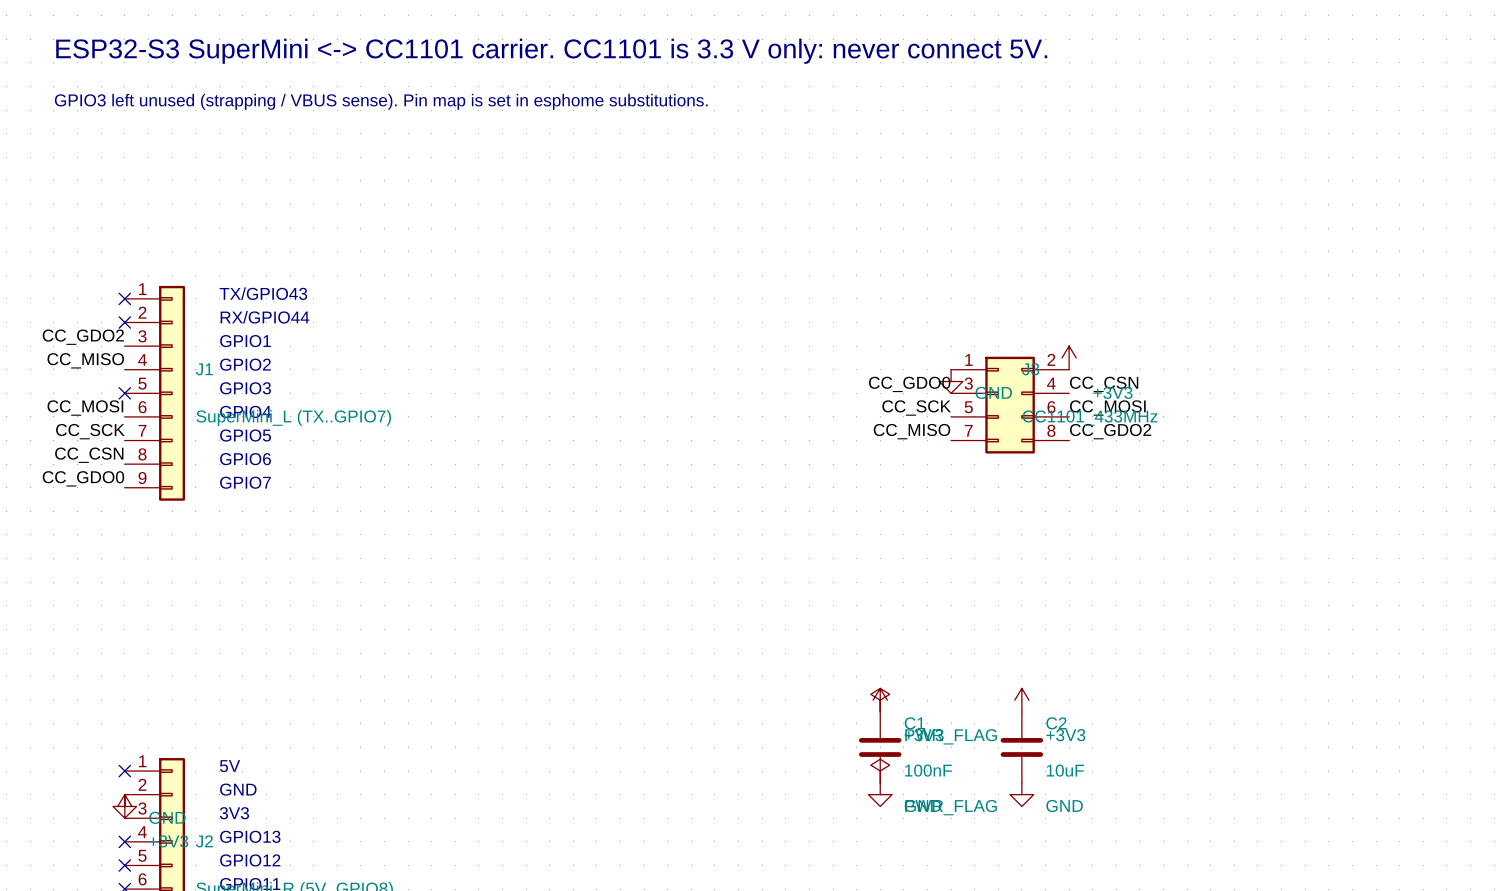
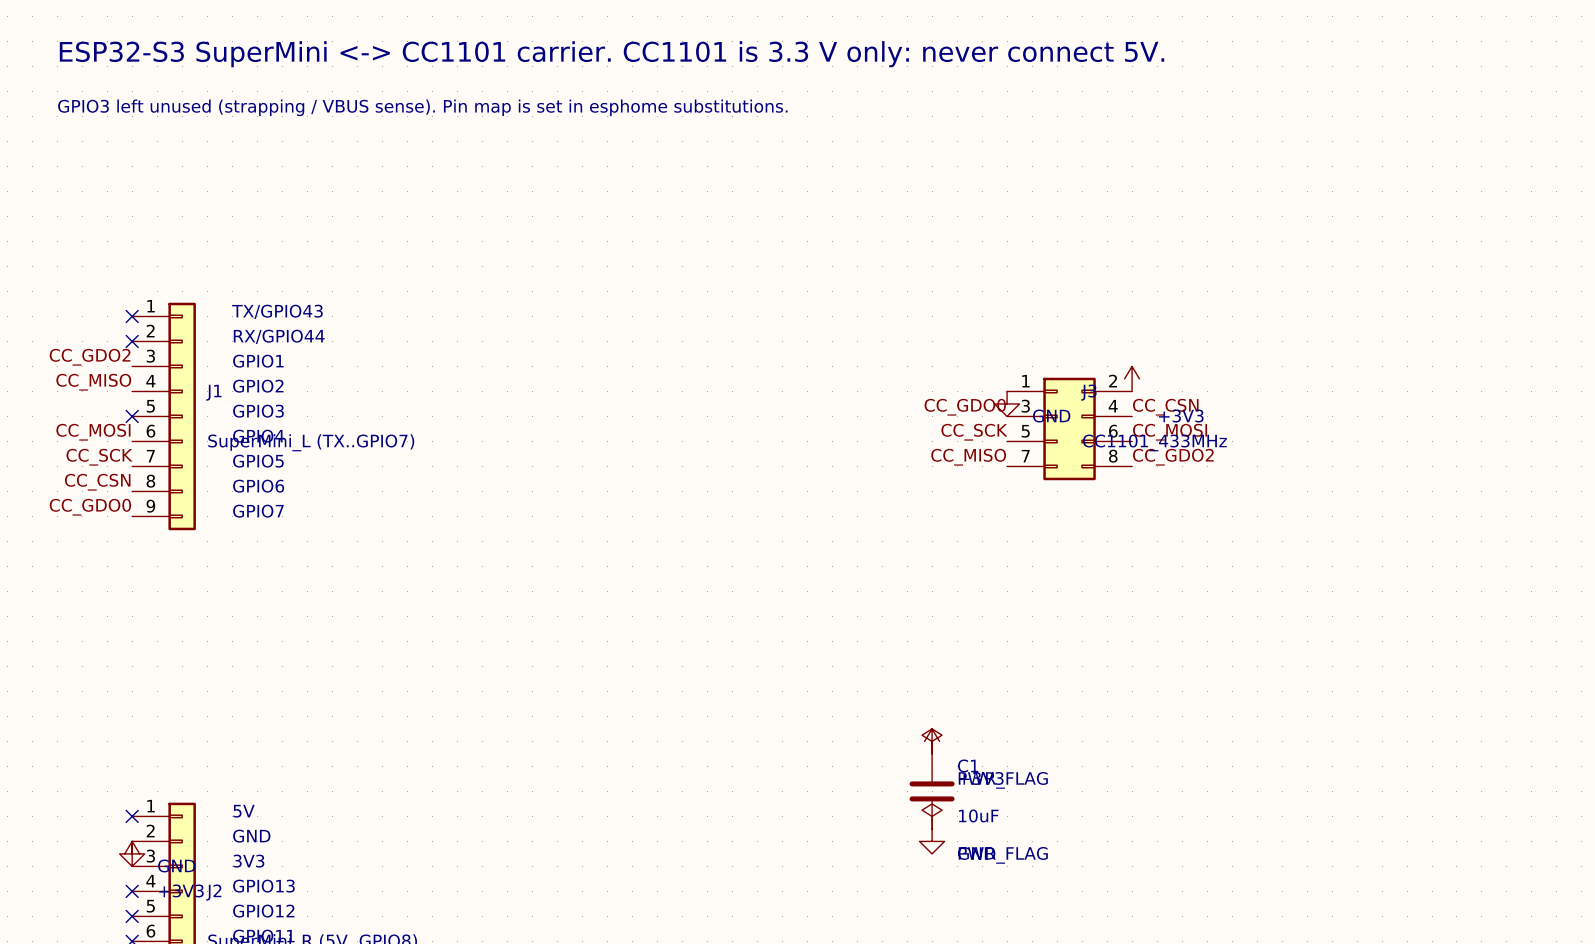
power symbol: +3V3 (1021, 700) -> none
C2: 10uF (1021, 747) -> none
C1 value: 100nF (928, 770) -> 10uF (978, 815)
power symbol: GND (1021, 794) -> none

